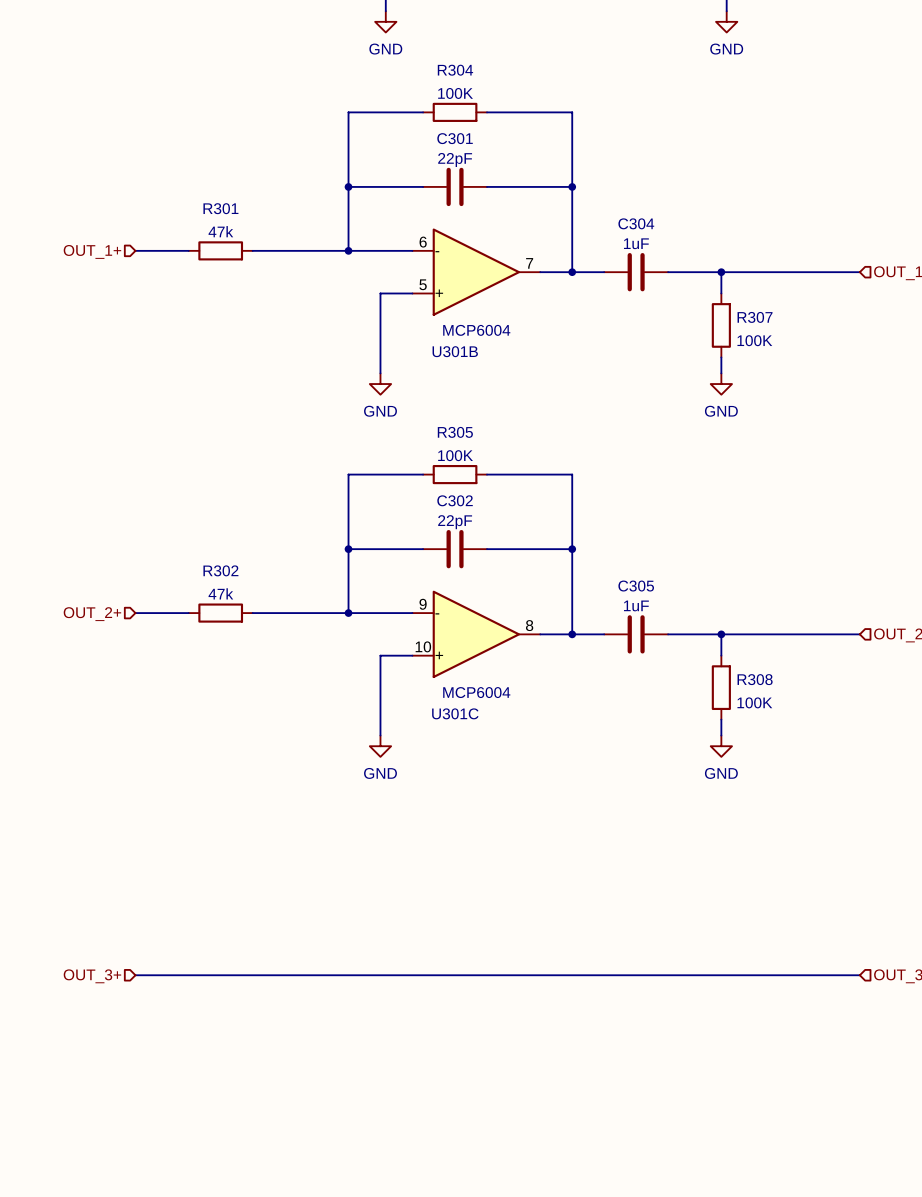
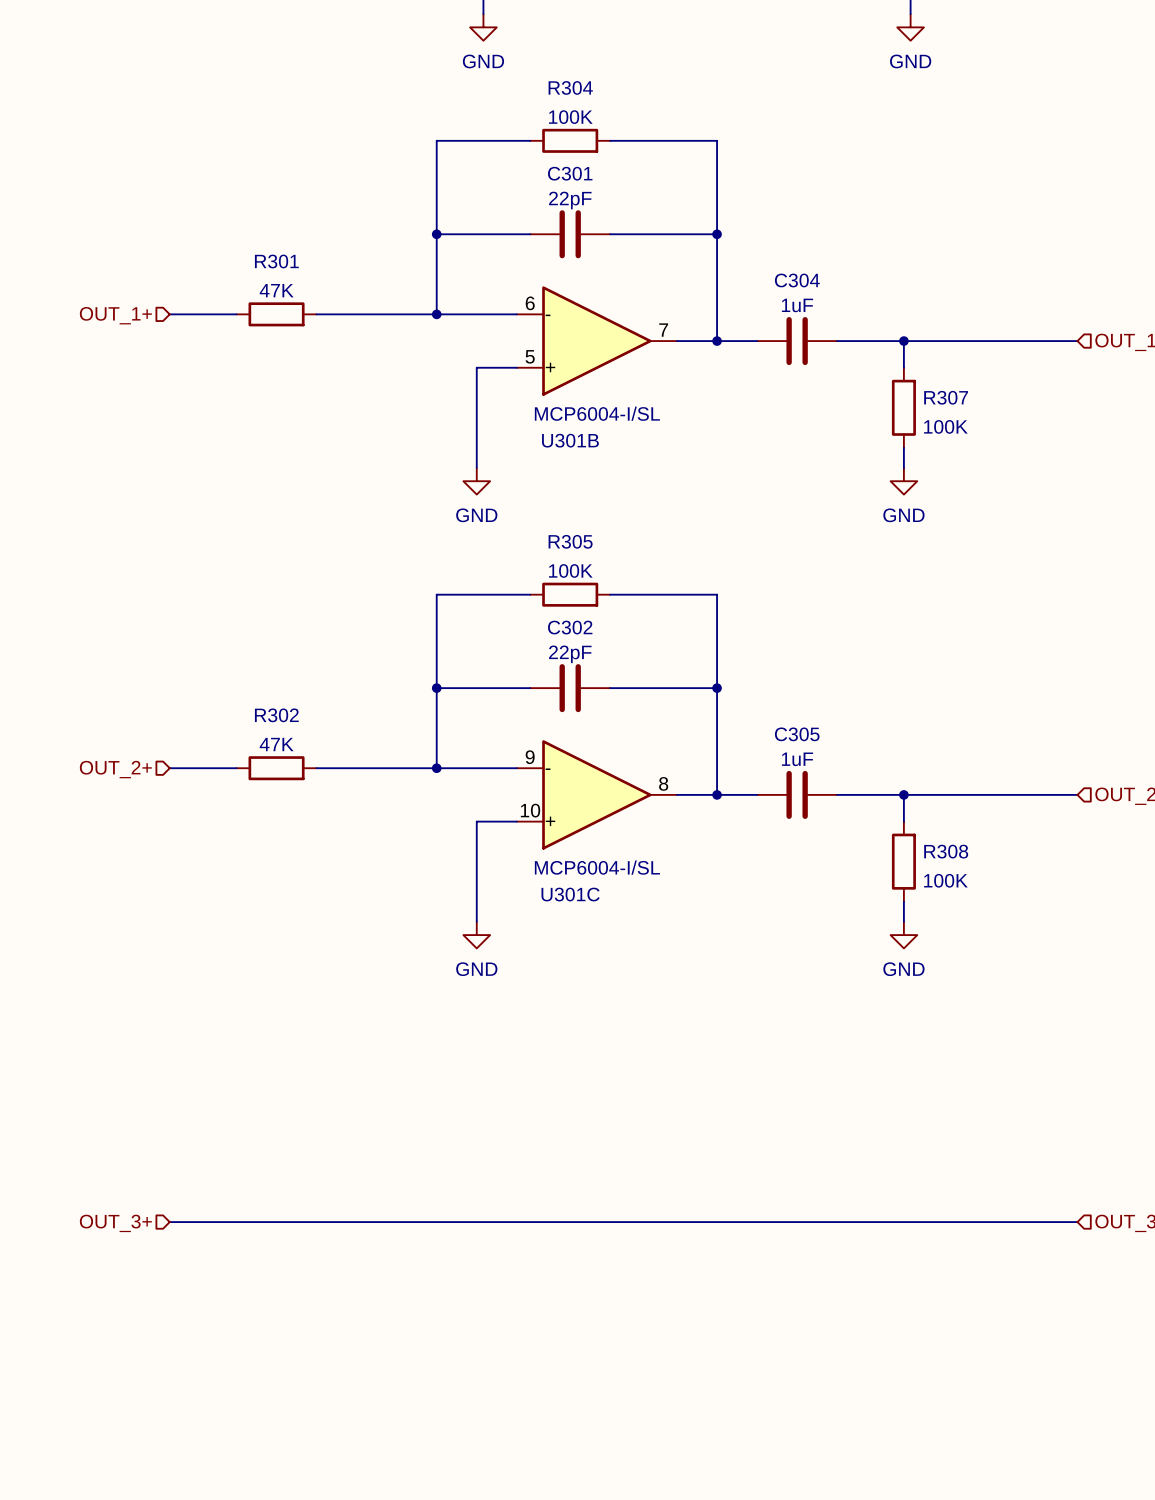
R301 value: 47k (220, 231) -> 47K (276, 290)
U301B value: MCP6004 (476, 330) -> MCP6004-I/SL (597, 413)
R302 value: 47k (220, 593) -> 47K (276, 744)
U301C value: MCP6004 (476, 692) -> MCP6004-I/SL (597, 867)

